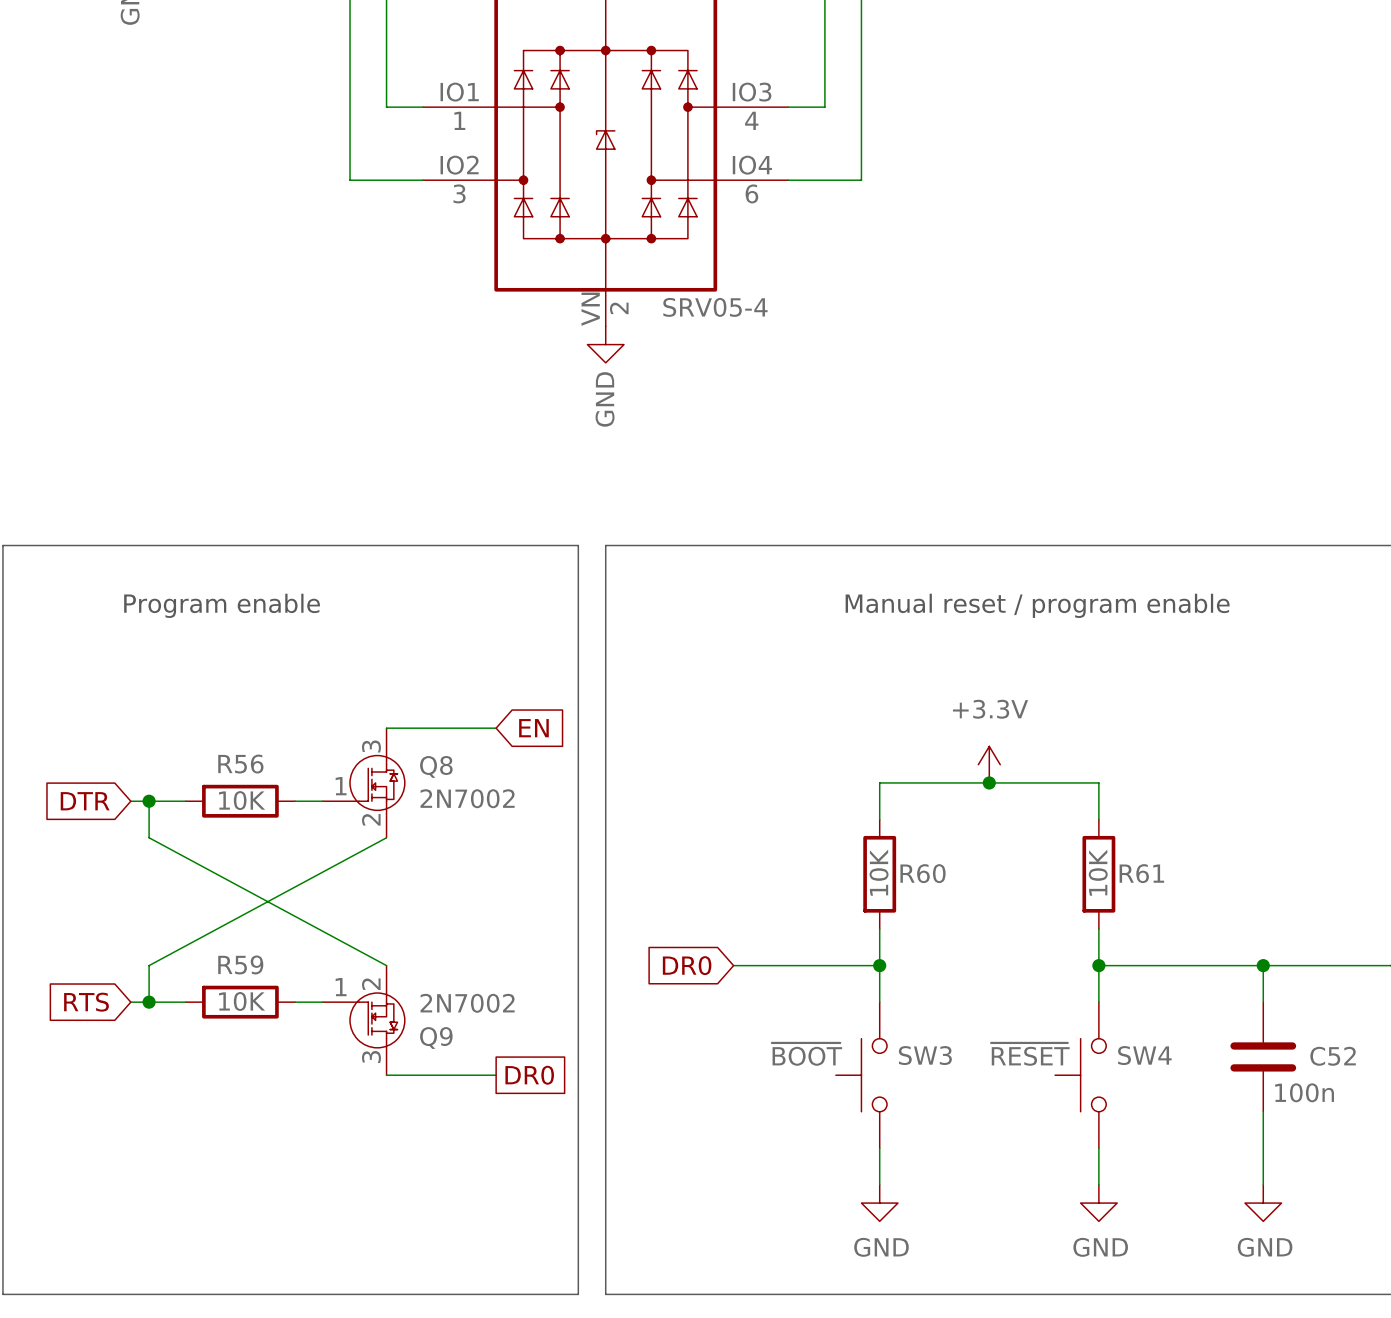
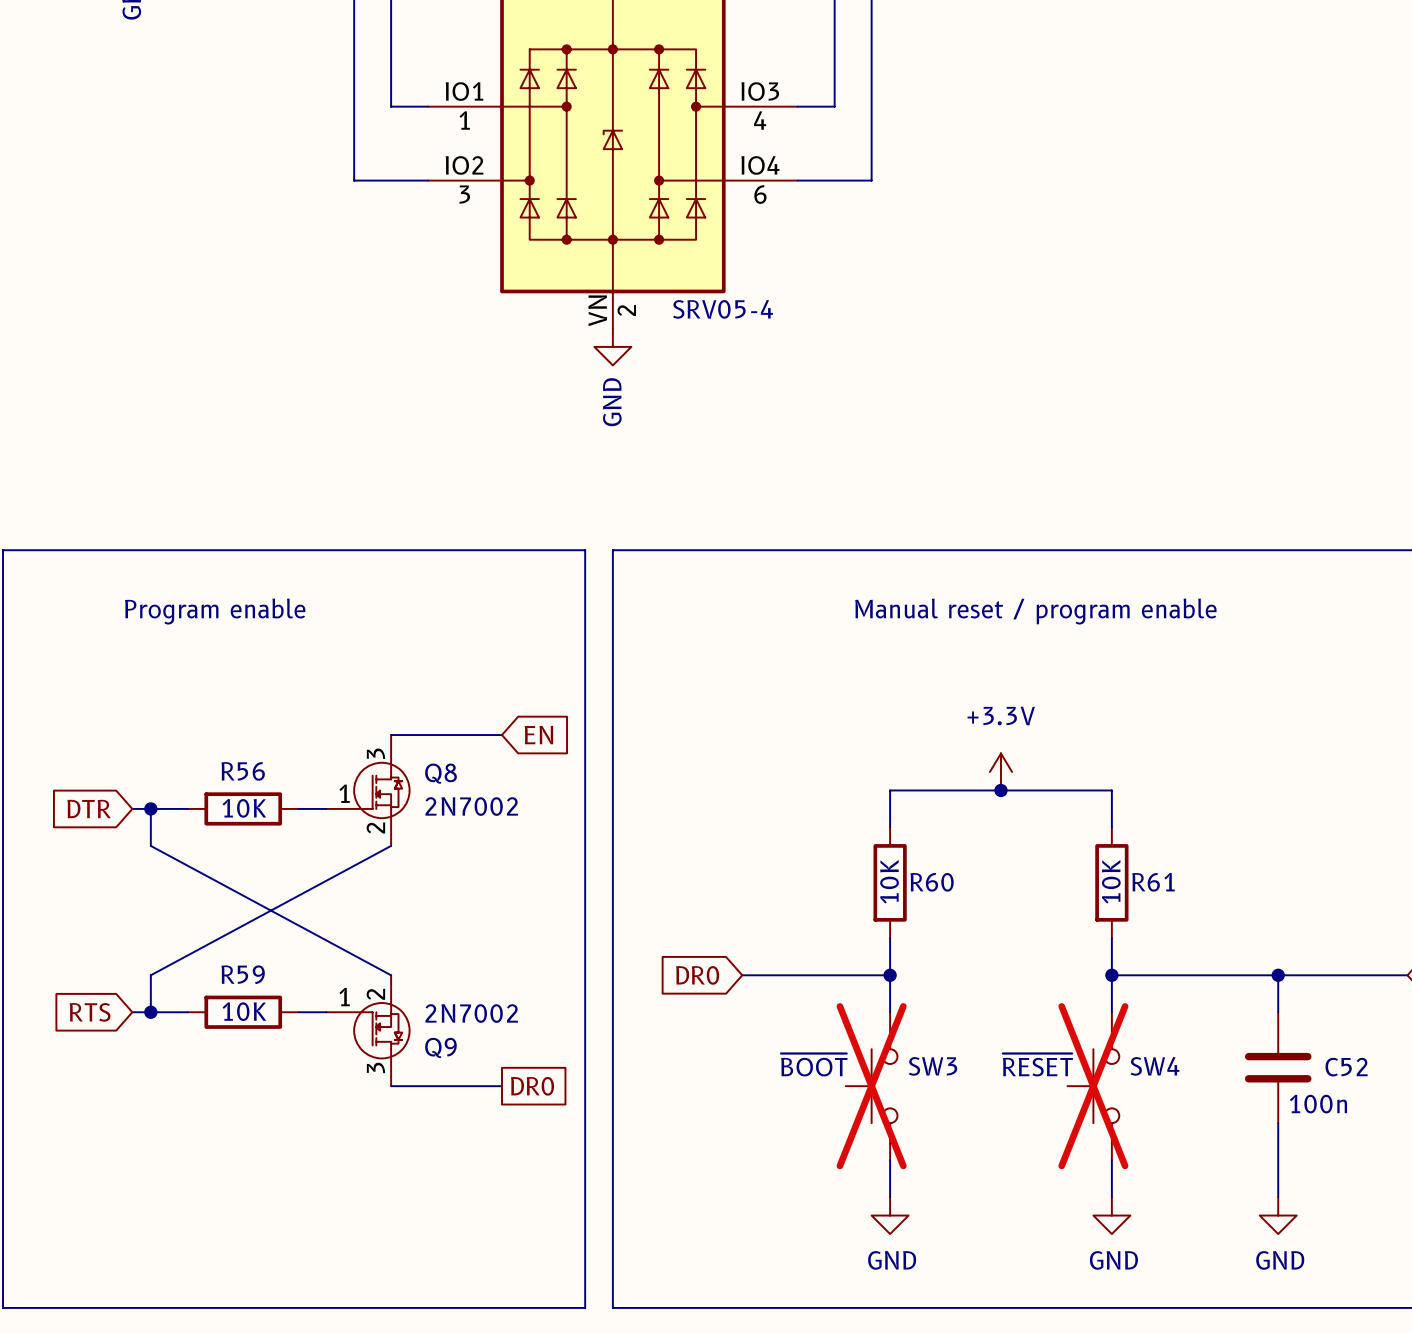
SW3 do-not-place cross: none -> (871, 1086)
SW4 do-not-place cross: none -> (1093, 1086)

